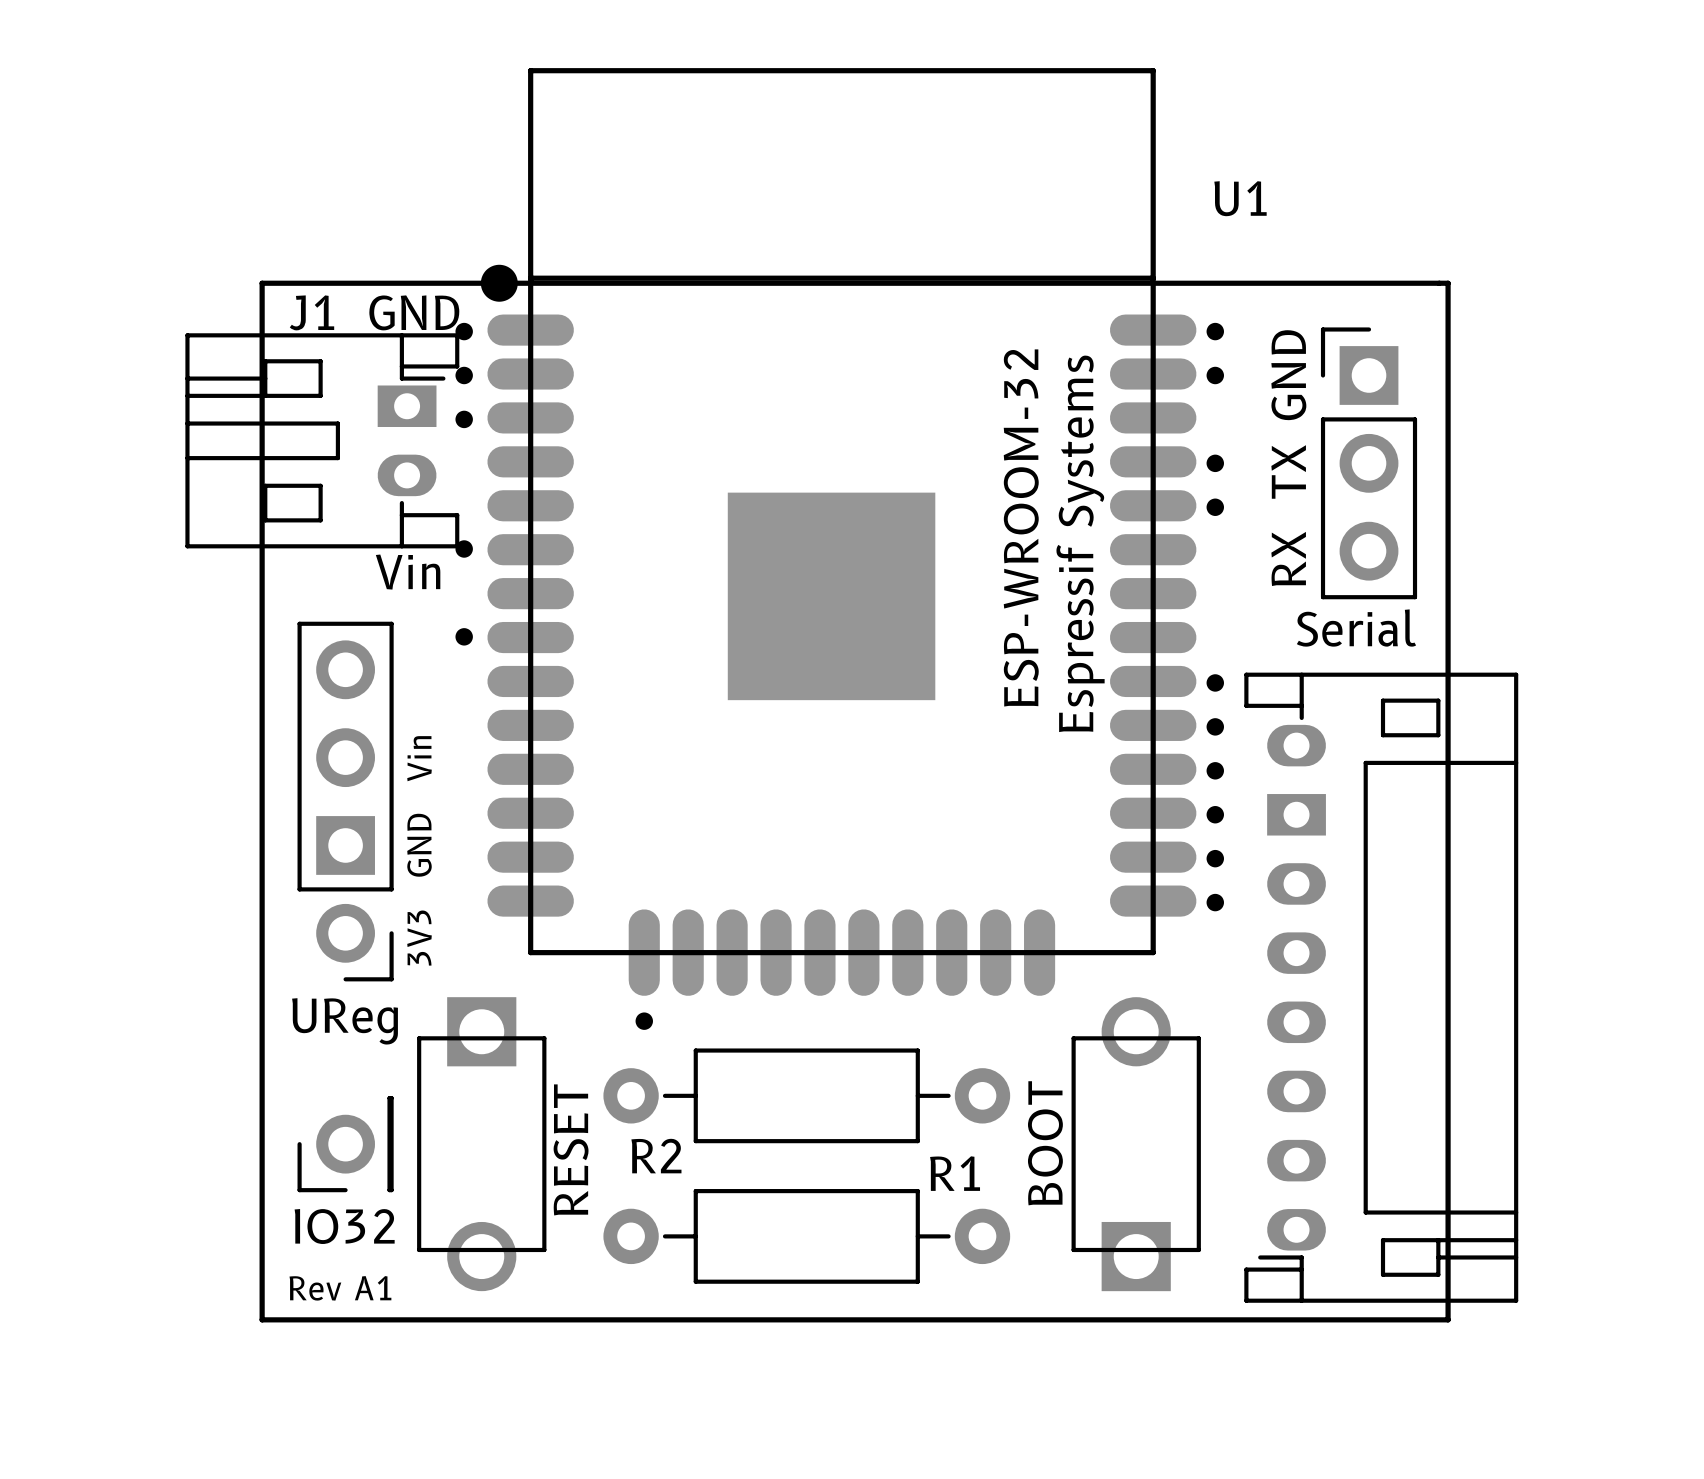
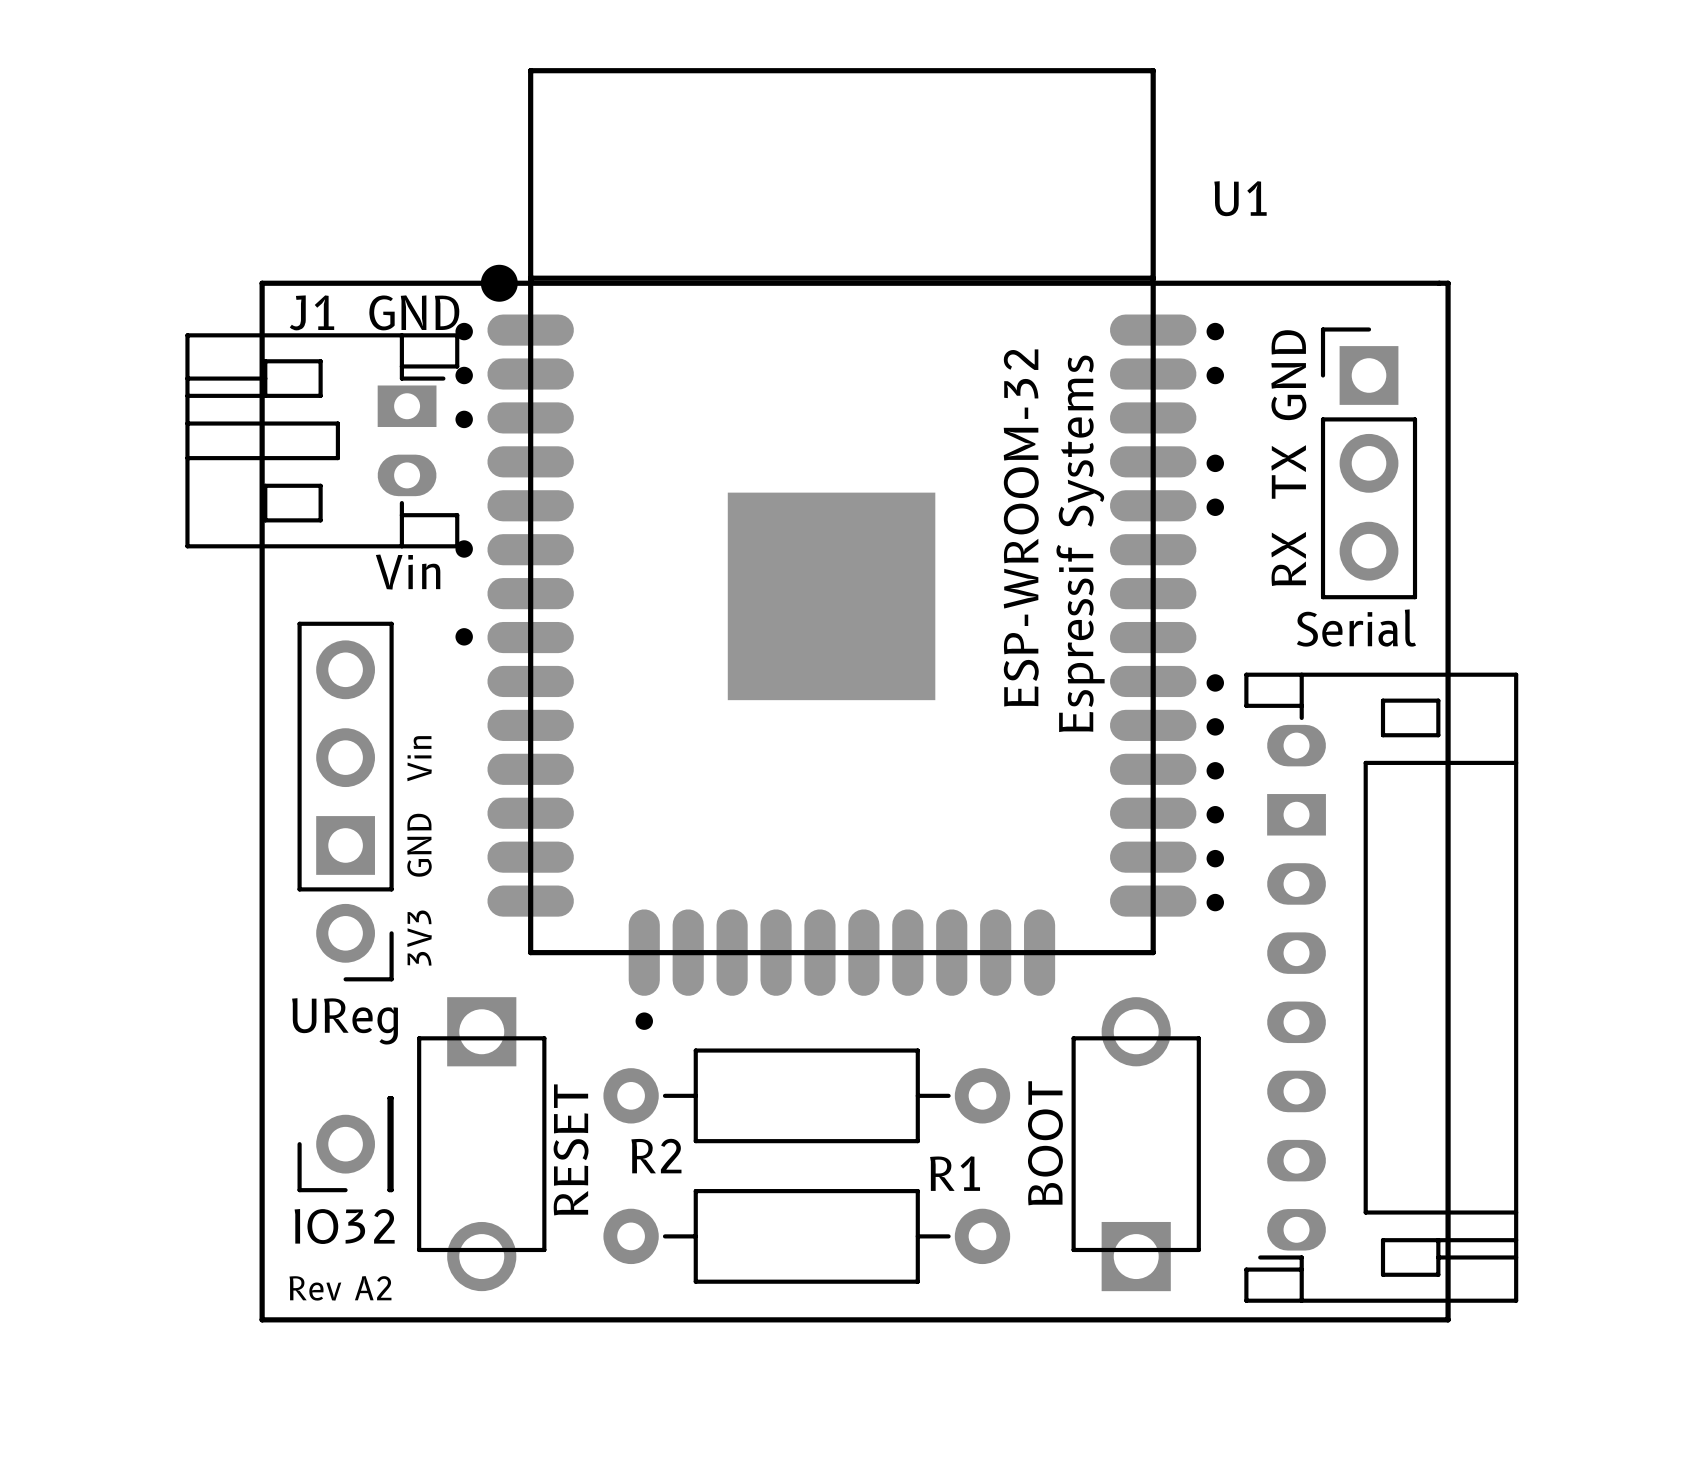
text: Rev A1 (340, 1288) -> Rev A2 (340, 1288)

